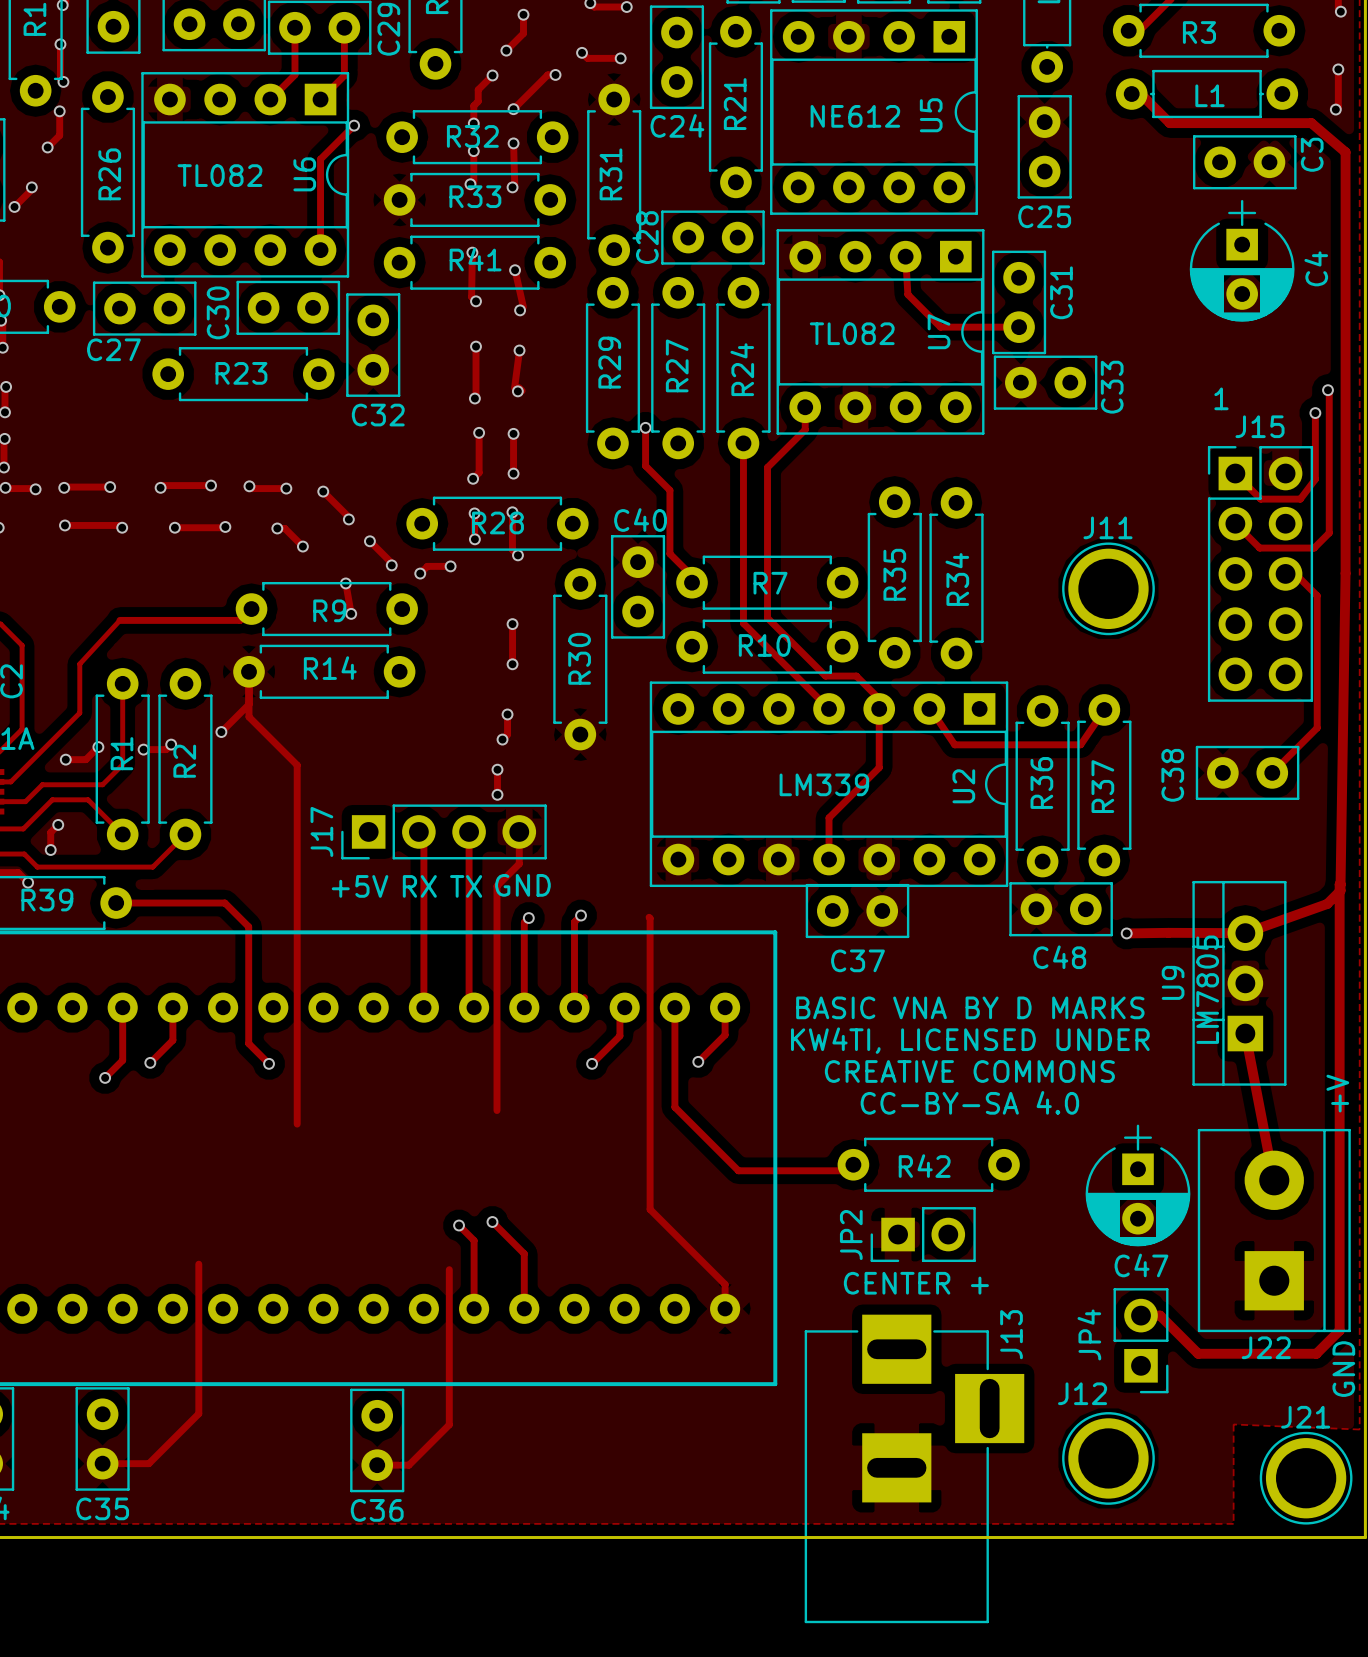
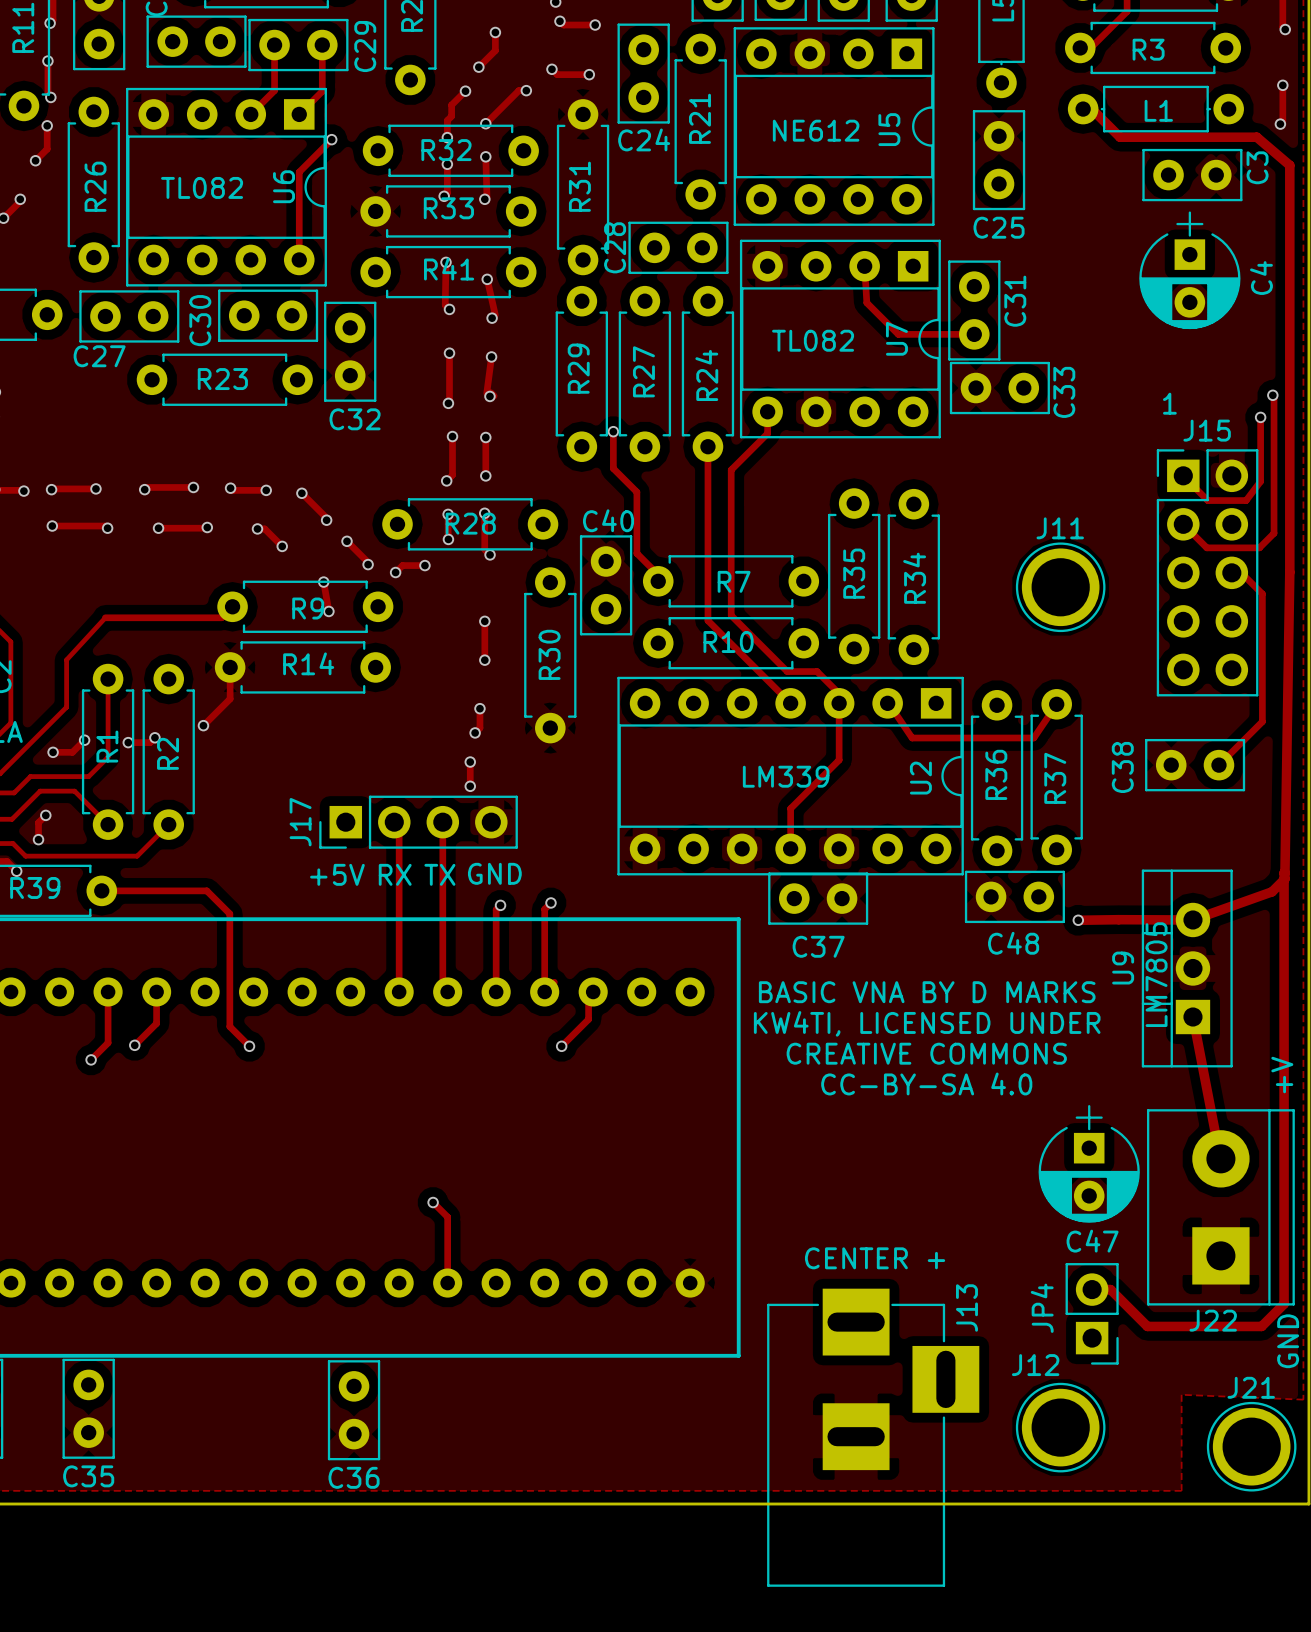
track: (249, 704) (249, 716) (297, 765) (297, 1124) -> none
track: (519, 831) (519, 863) (496, 886) (496, 1110) -> none
track: (649, 917) (650, 1209) (725, 1284) (725, 1308) -> none
track: (674, 1007) (674, 1107) (738, 1170) (847, 1170) (853, 1164) -> none
track: (725, 1007) (725, 1035) (698, 1061) -> none
via: (698, 1061) -> none
R42: (928, 1164) -> none
track: (492, 1221) (524, 1253) (524, 1308) -> none
via: (492, 1221) -> none
JP2: (923, 1234) -> none
track: (198, 1264) (198, 1413) (148, 1463) (102, 1463) -> none
track: (449, 1269) (449, 1424) (408, 1465) (377, 1465) -> none

